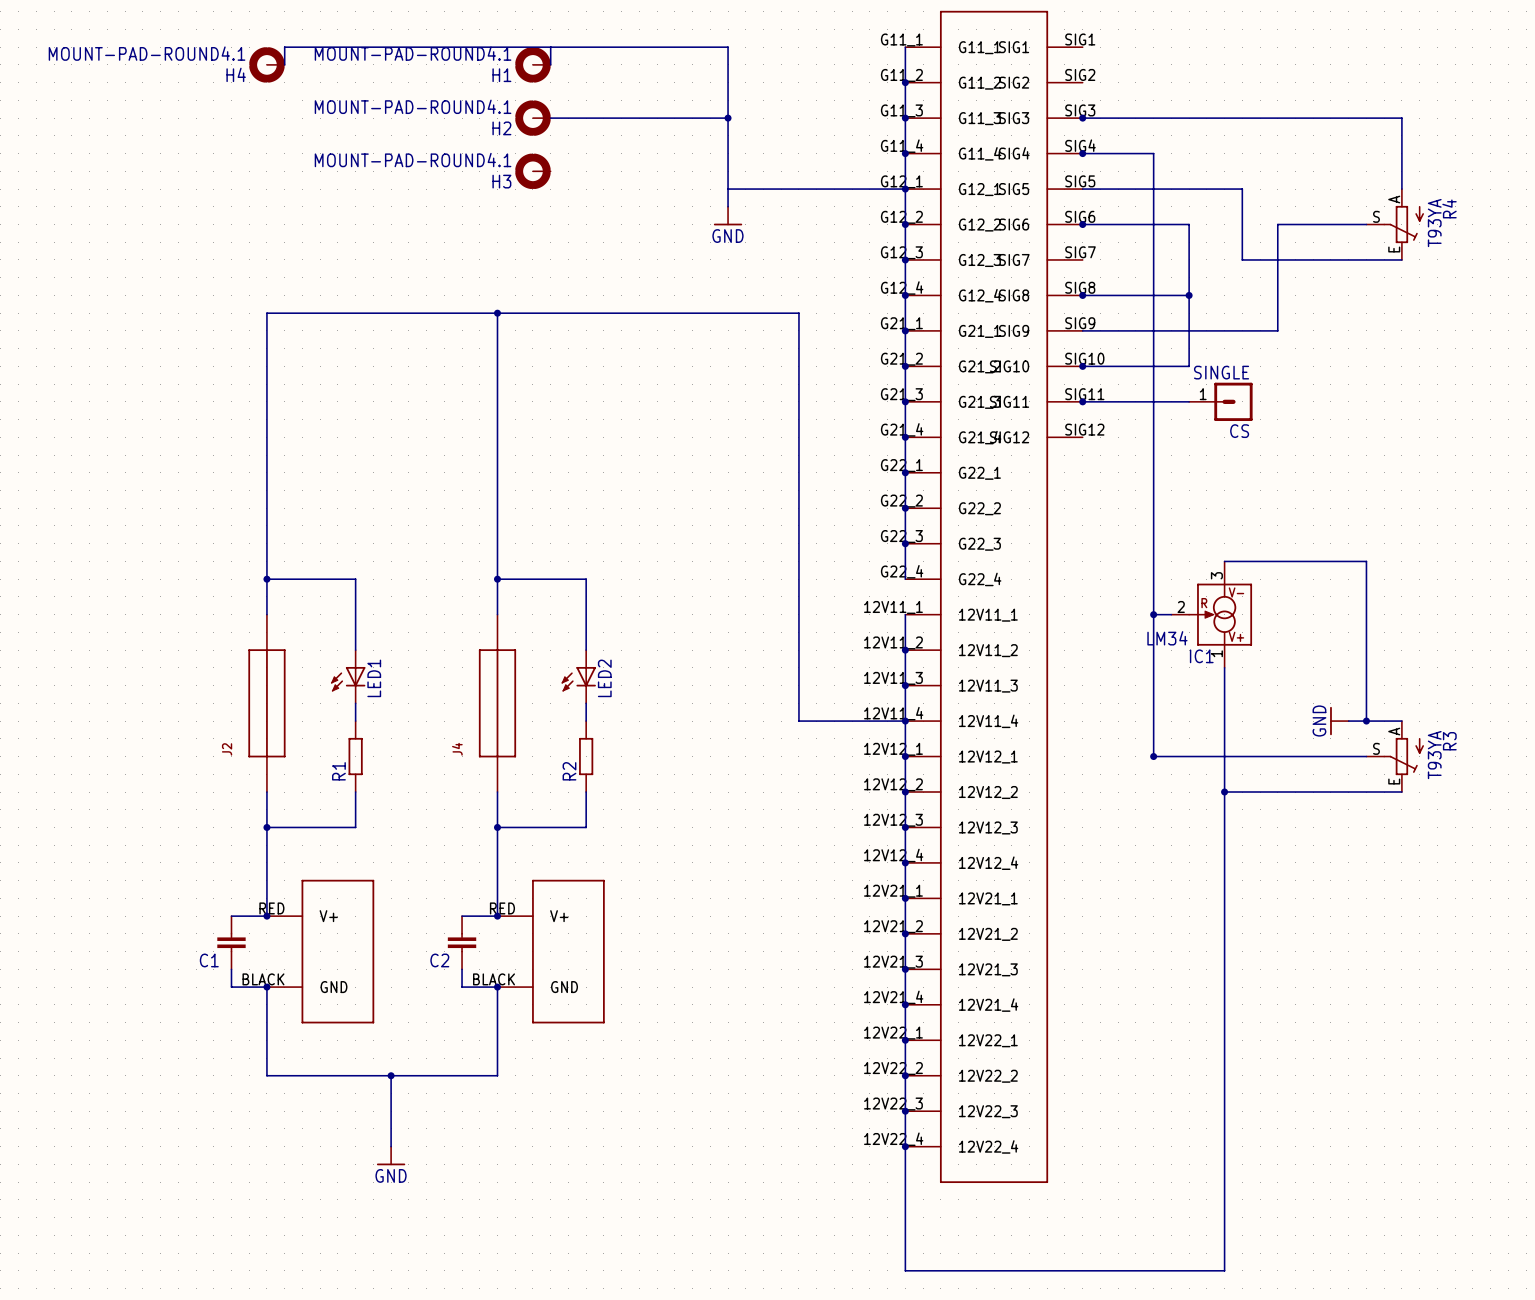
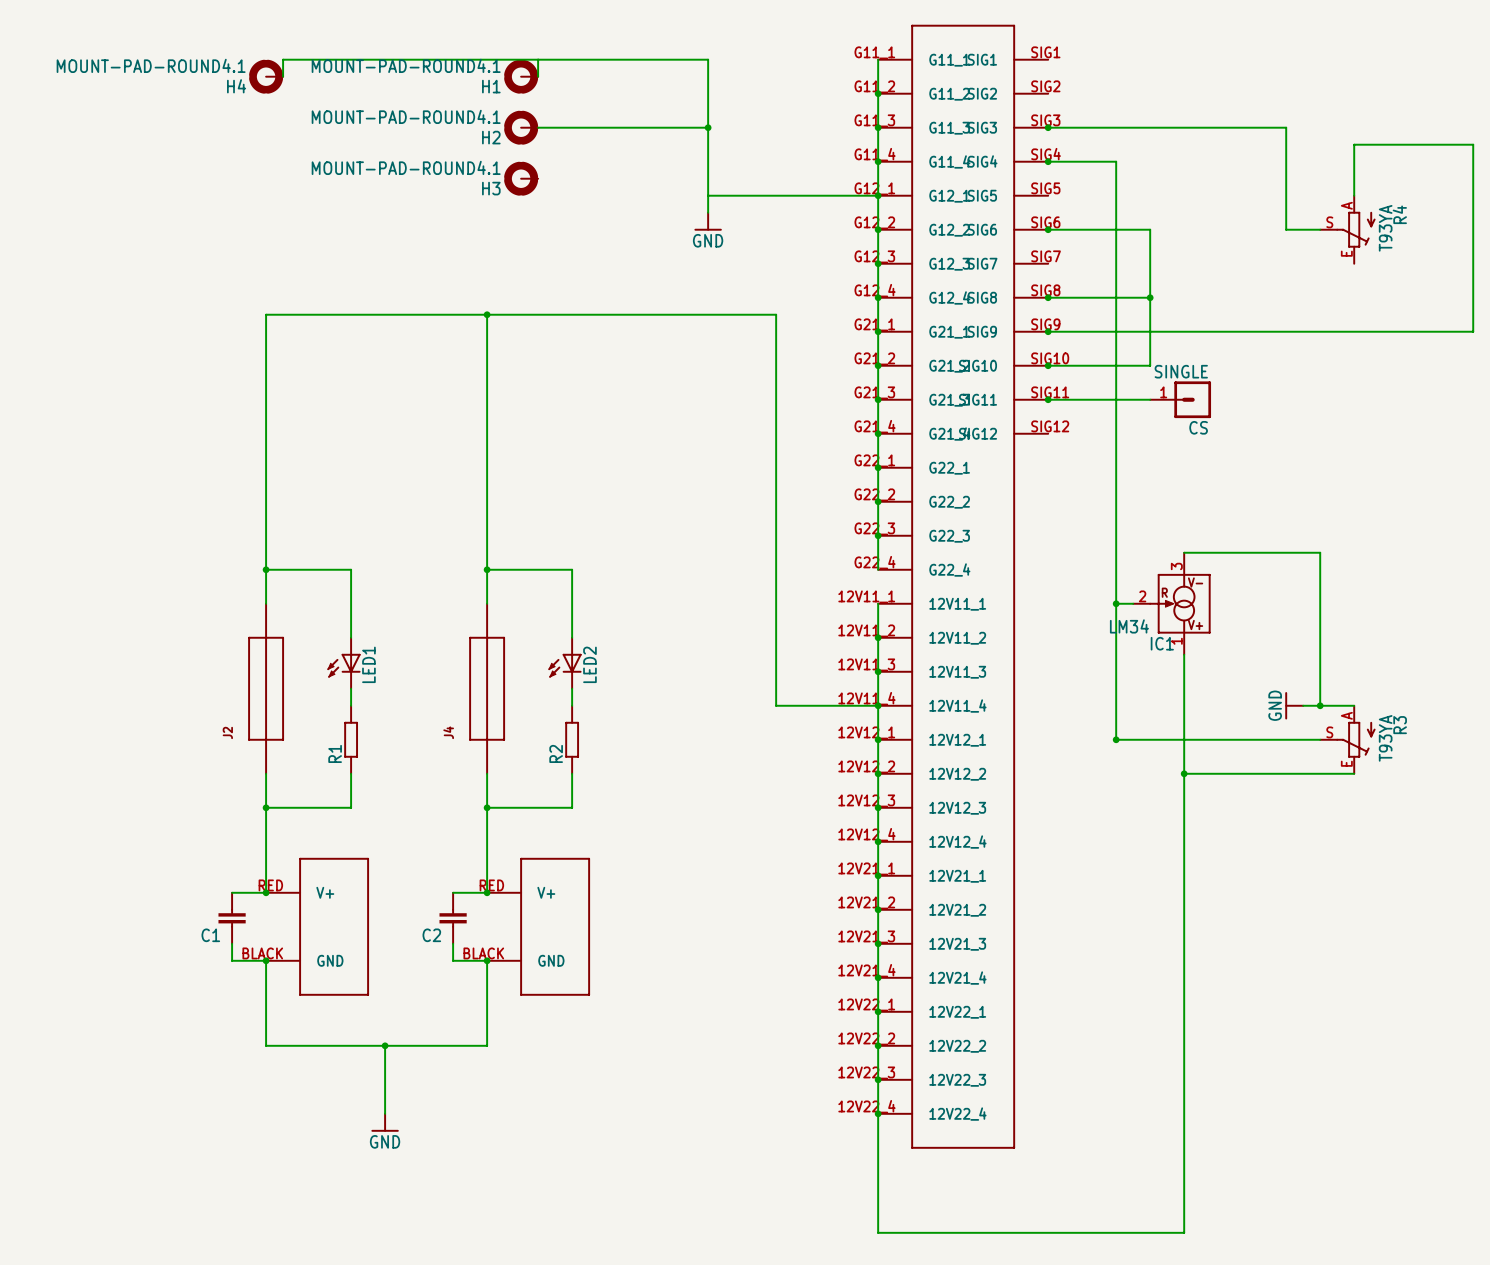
wire: (1330, 118) (1401, 118) (1401, 135) -> (1286, 127) (1286, 229)
wire: (1082, 189) (1242, 189) (1242, 259) (1401, 259) -> none
wire: (1330, 224) (1277, 224) (1277, 330) -> (1354, 144) (1473, 144) (1473, 331) (1235, 331)
junction: none -> (1048, 331)

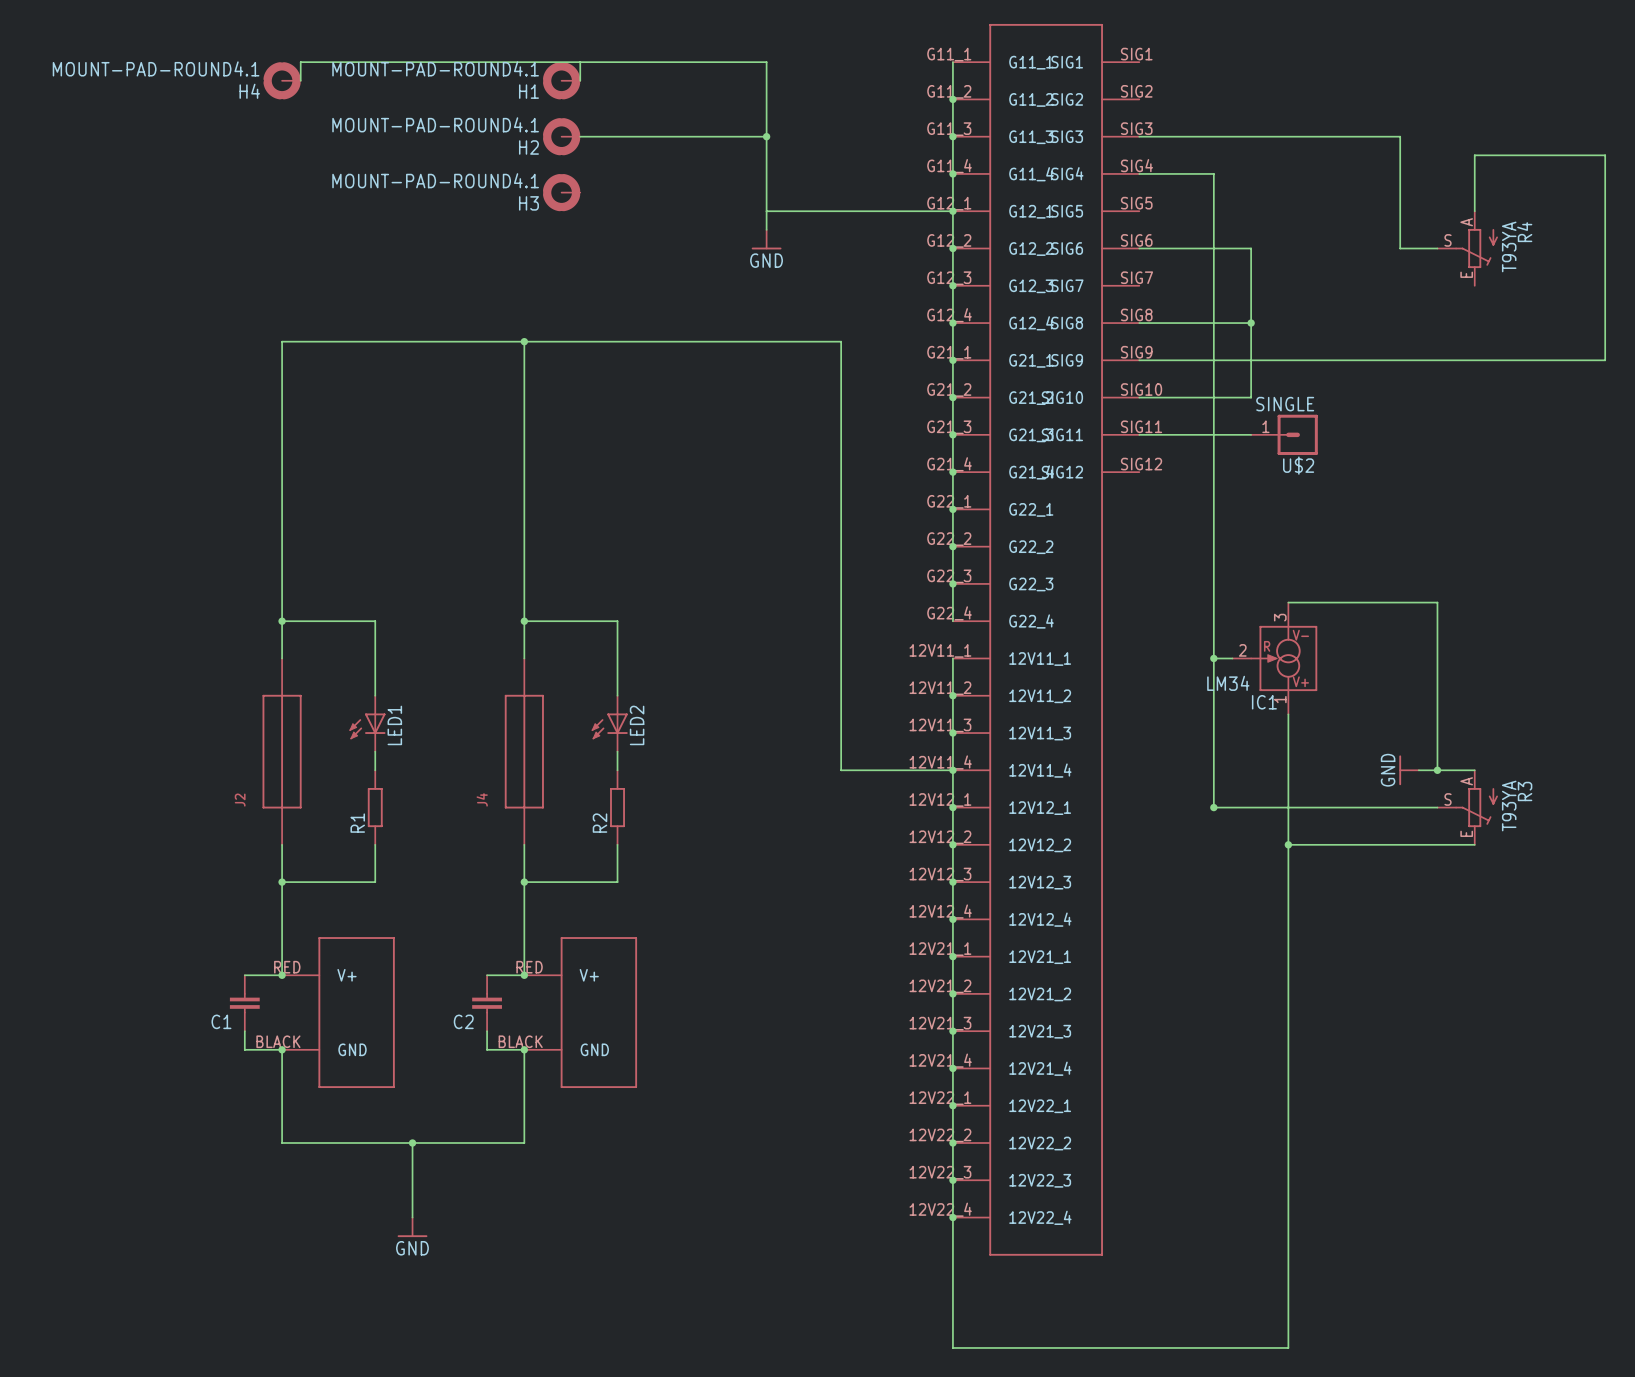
junction: (1048, 127) -> none
junction: (1048, 161) -> none
junction: (1048, 229) -> none
junction: (1048, 297) -> none
junction: (1048, 331) -> none
junction: (1048, 365) -> none
junction: (1048, 399) -> none
CS name: CS (1198, 427) -> U$2 (1298, 465)

